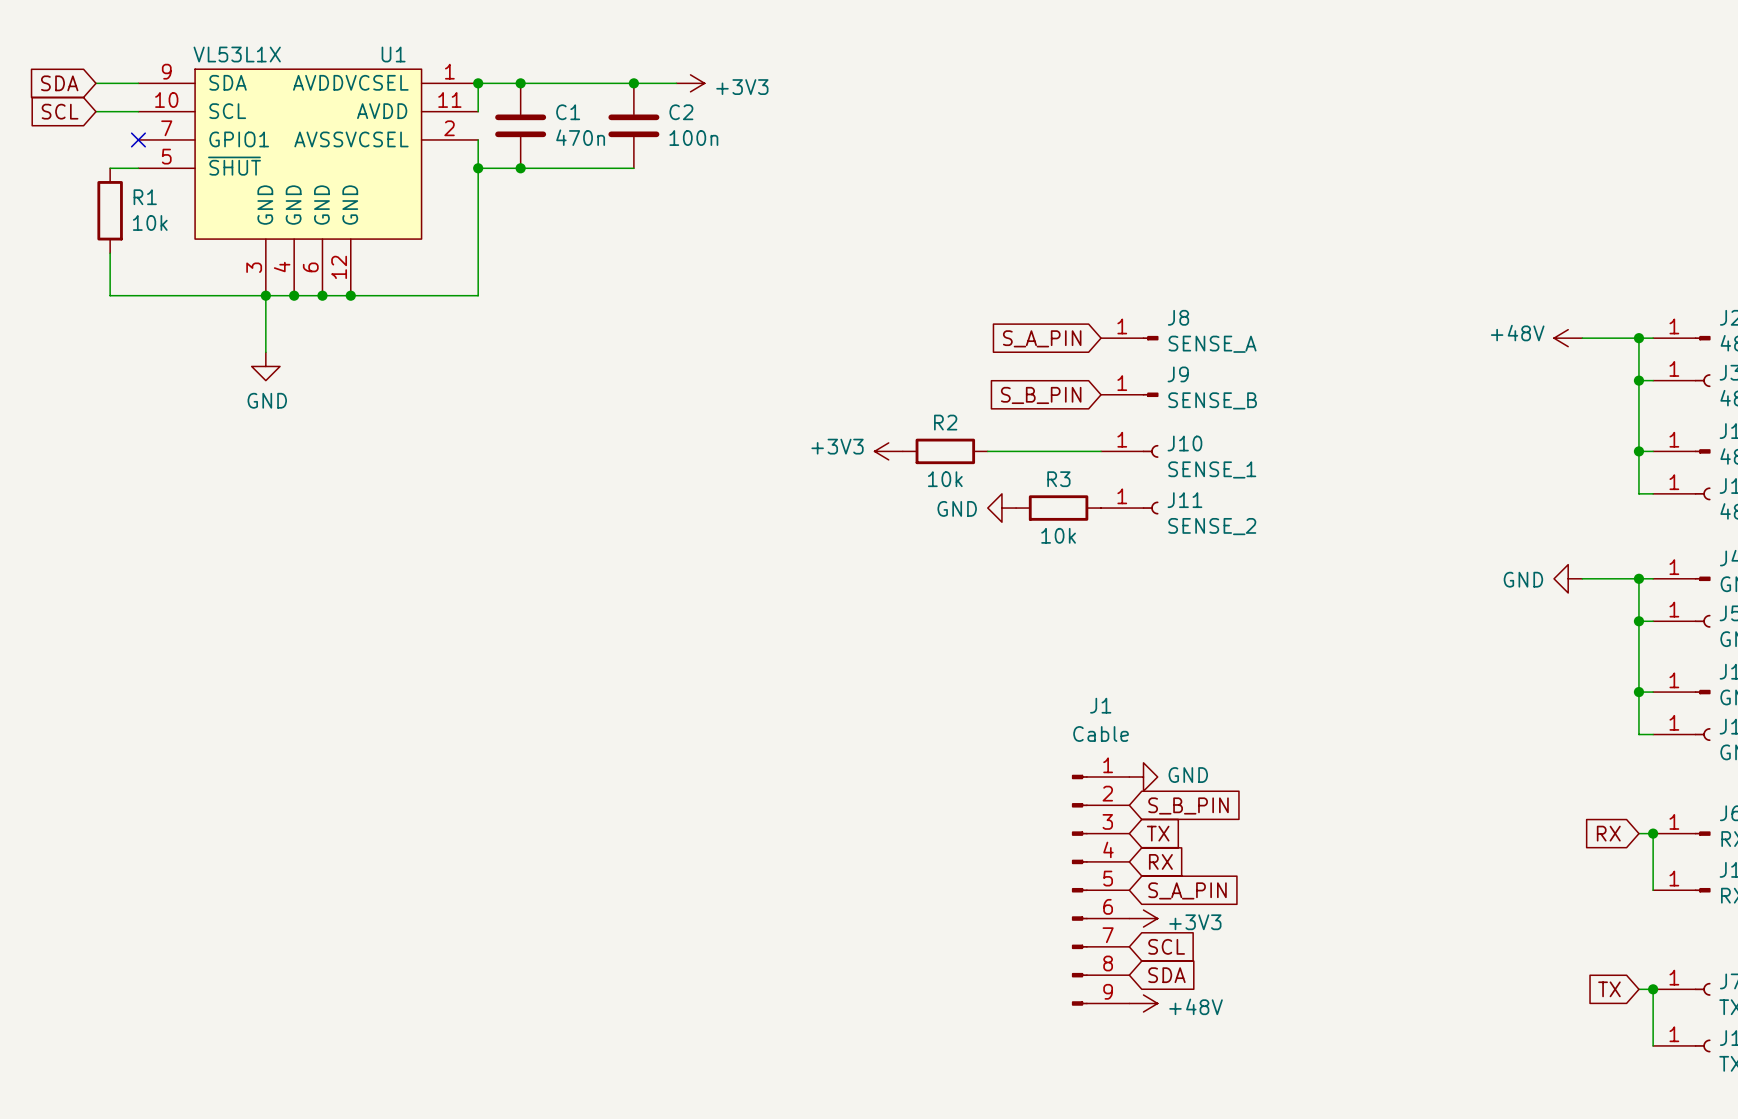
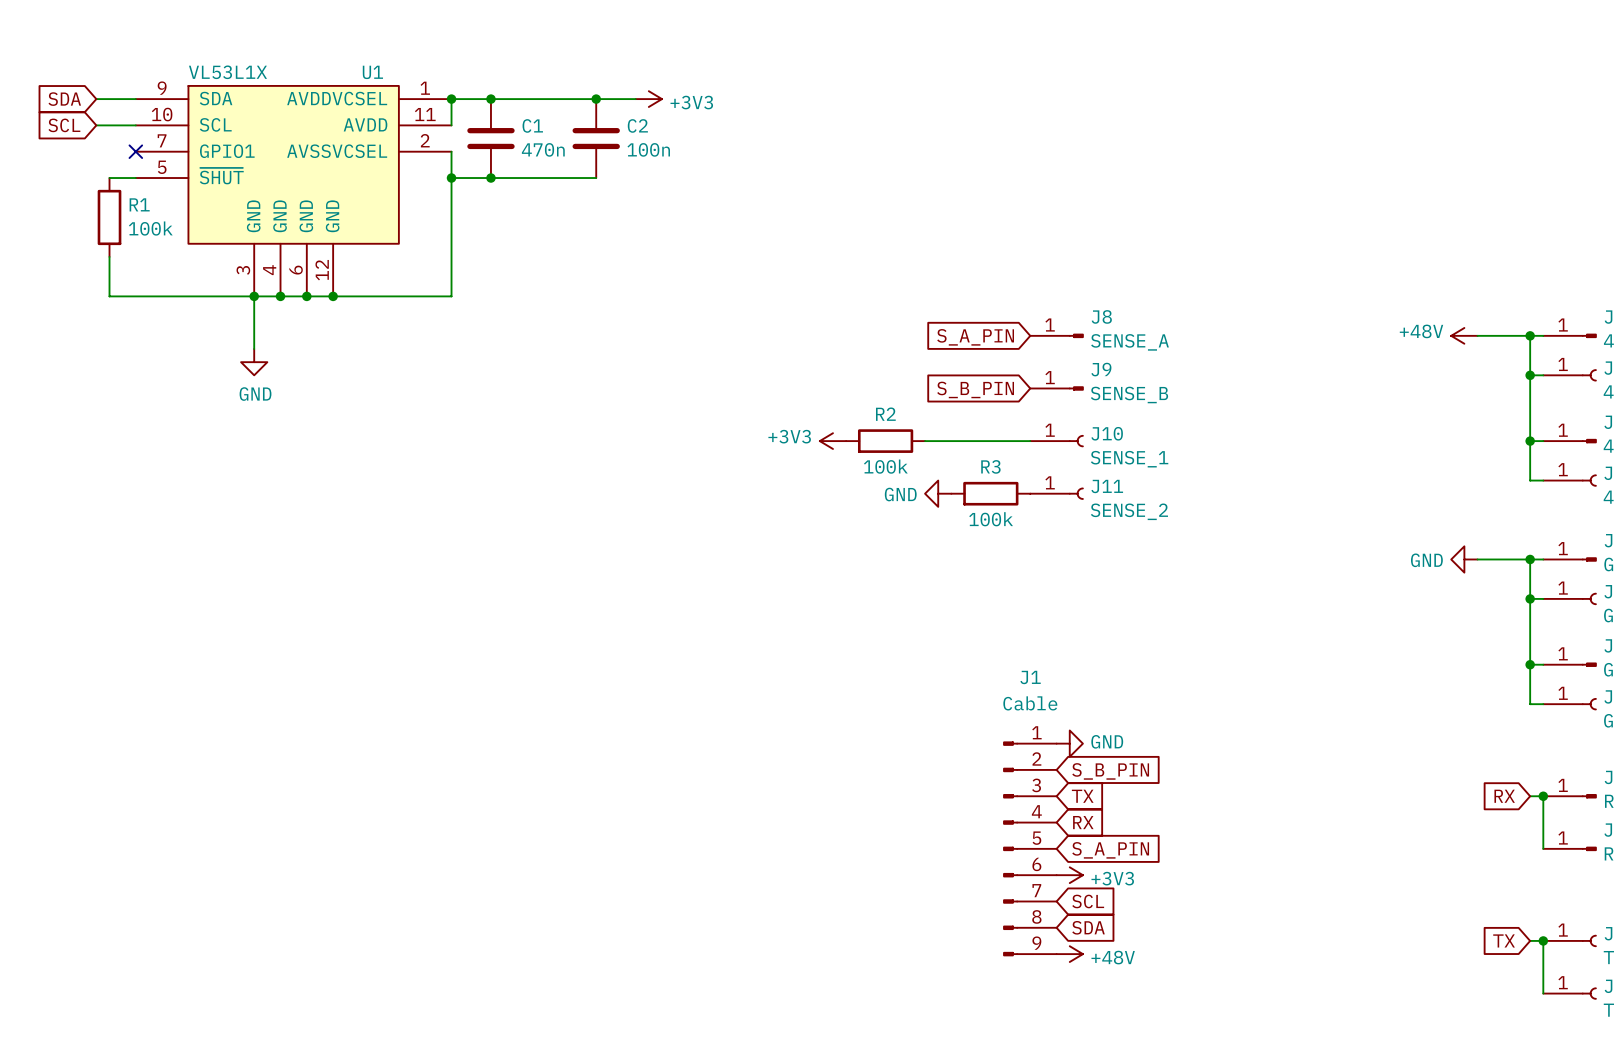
R1 value: 10k (150, 222) -> 100k (150, 228)
R2 value: 10k (945, 479) -> 100k (885, 466)
R3 value: 10k (1058, 535) -> 100k (991, 519)

